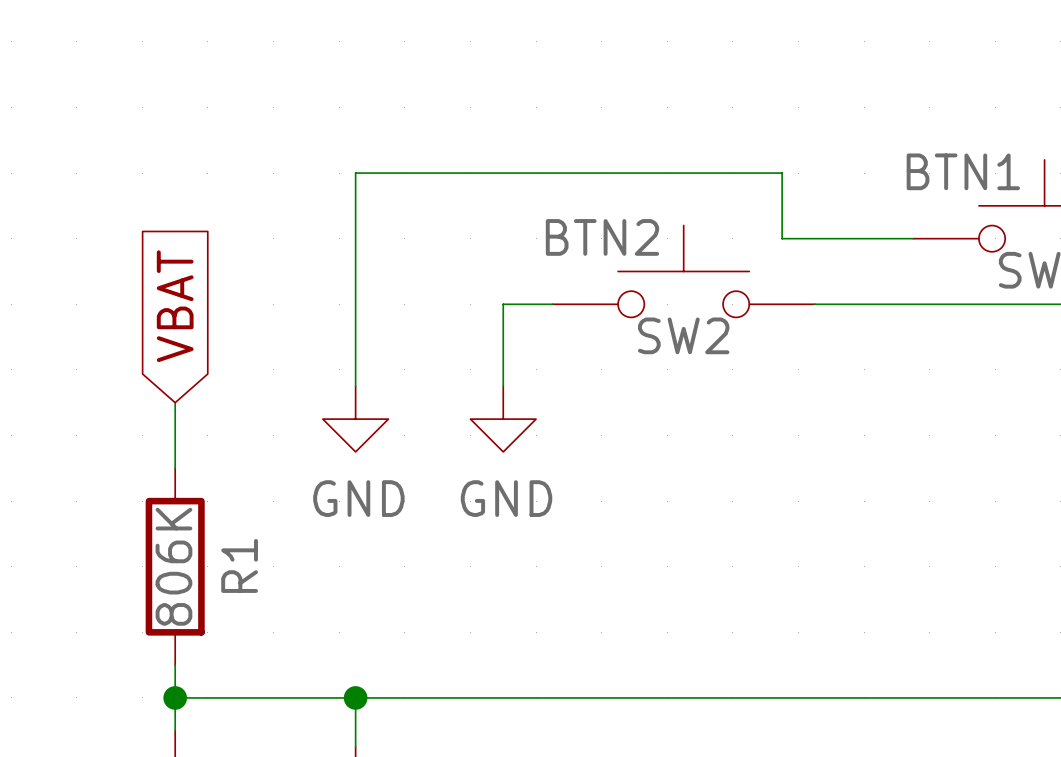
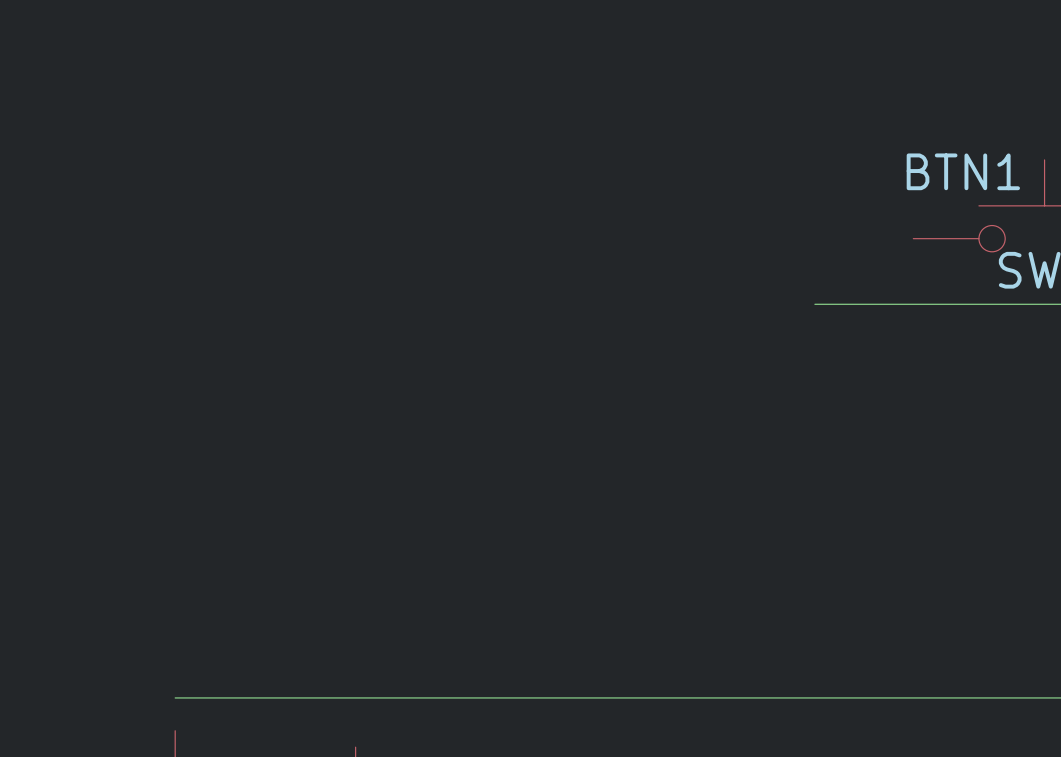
wire: (913, 238) (782, 238) (782, 173) (355, 173) (355, 386) -> none
SW2: BTN2 (683, 271) -> none
wire: (552, 304) (503, 304) (503, 386) -> none
global label: VBAT (175, 306) -> none
wire: (175, 402) (175, 468) -> none
power symbol: GND (355, 419) -> none
power symbol: GND (503, 419) -> none
R1: 806K (175, 566) -> none
wire: (175, 665) (175, 730) -> none
junction: (175, 697) -> none
wire: (355, 697) (355, 747) -> none
junction: (355, 697) -> none

